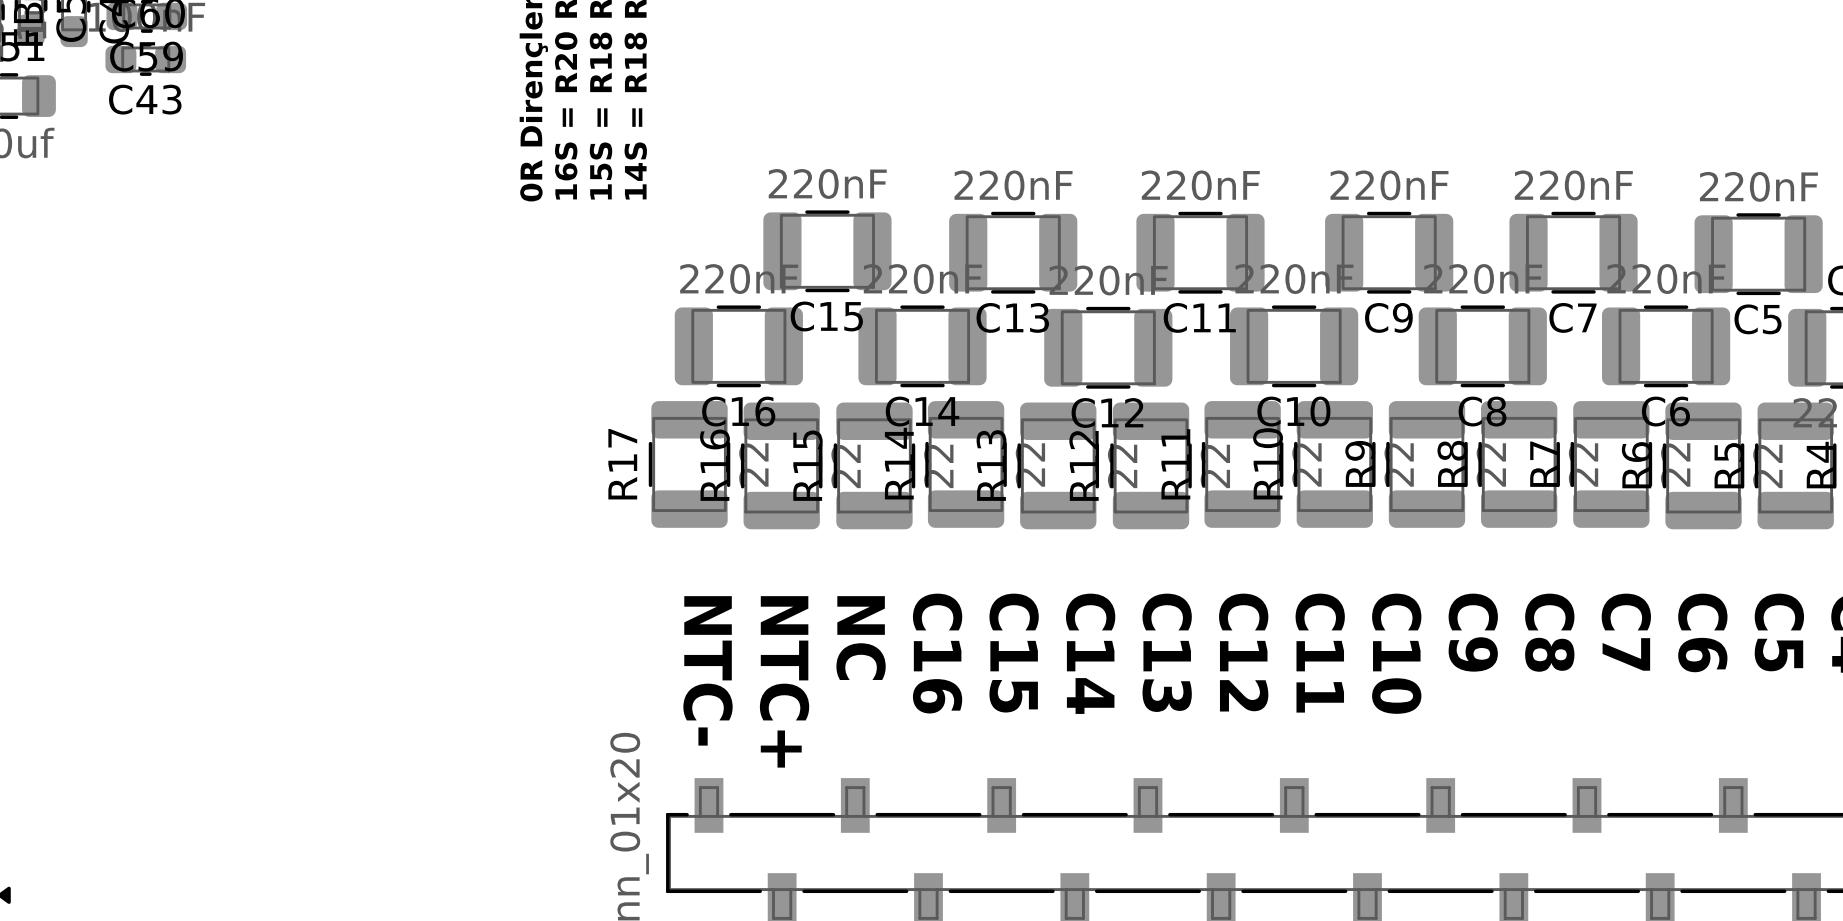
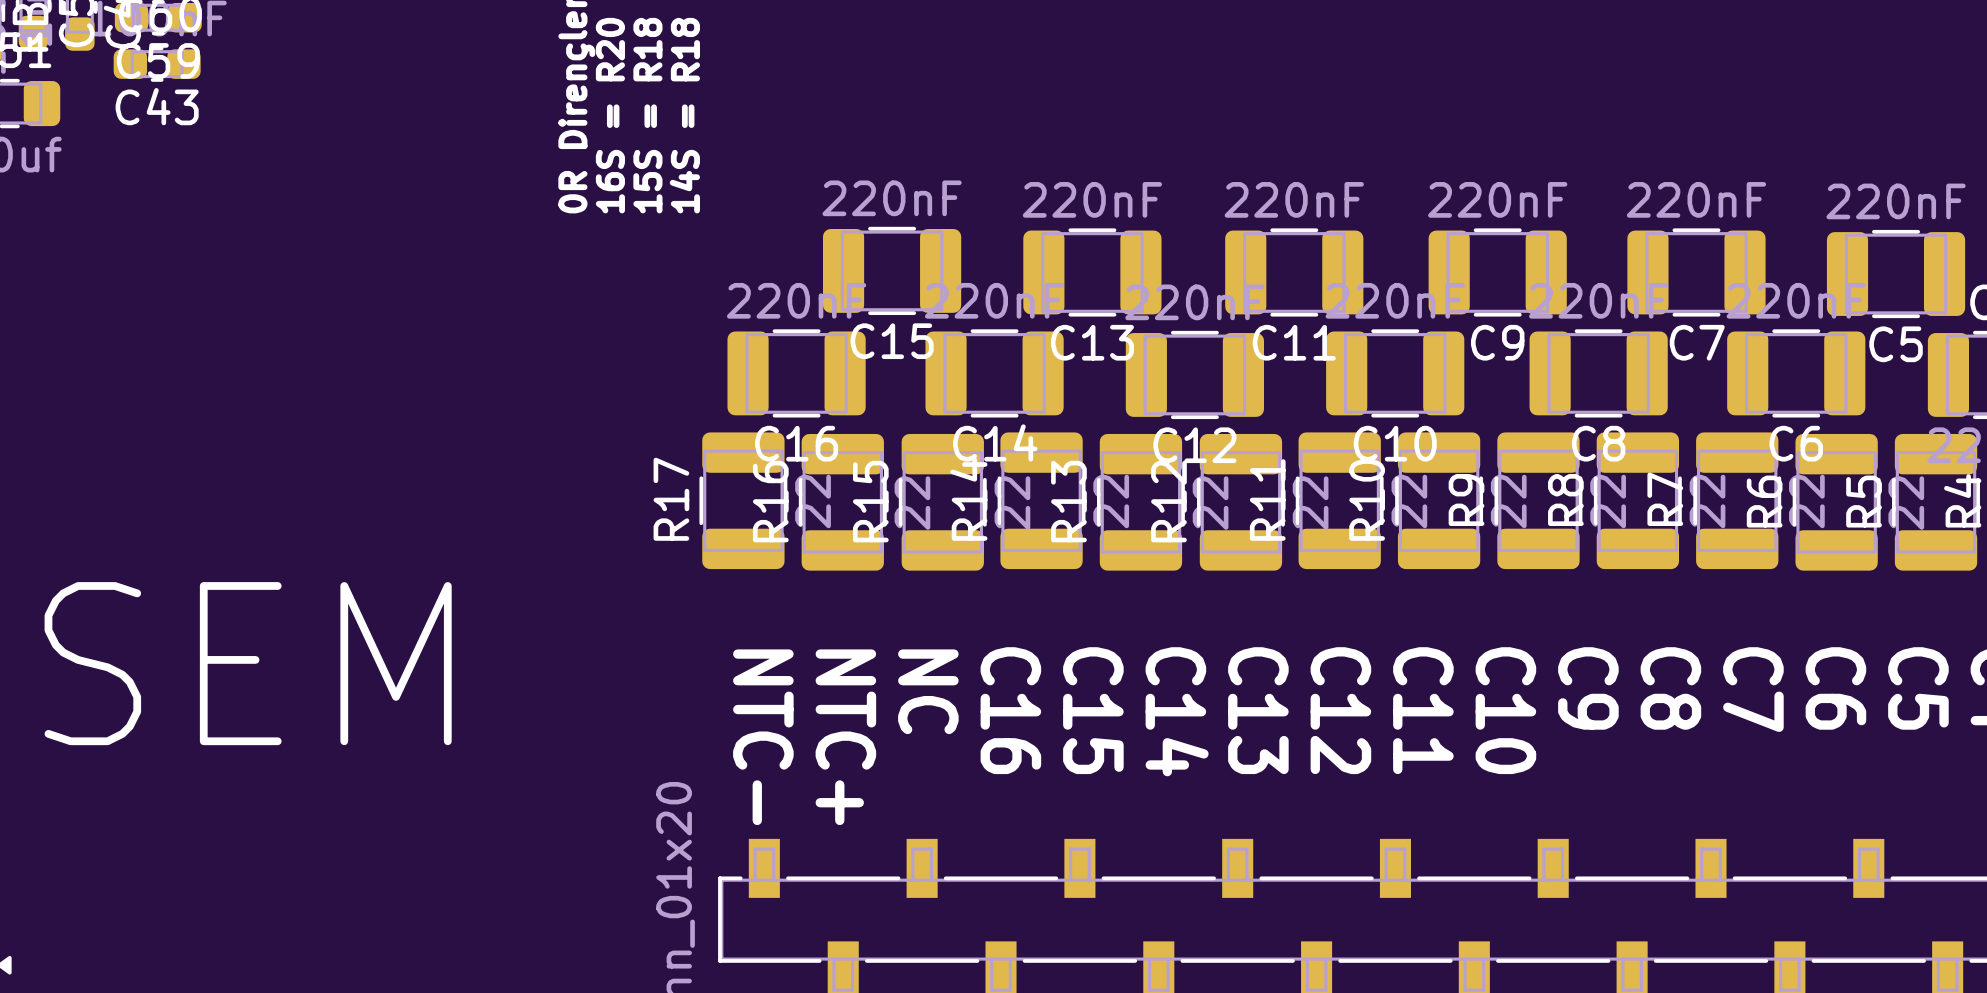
text: none -> SEM (248, 663)

